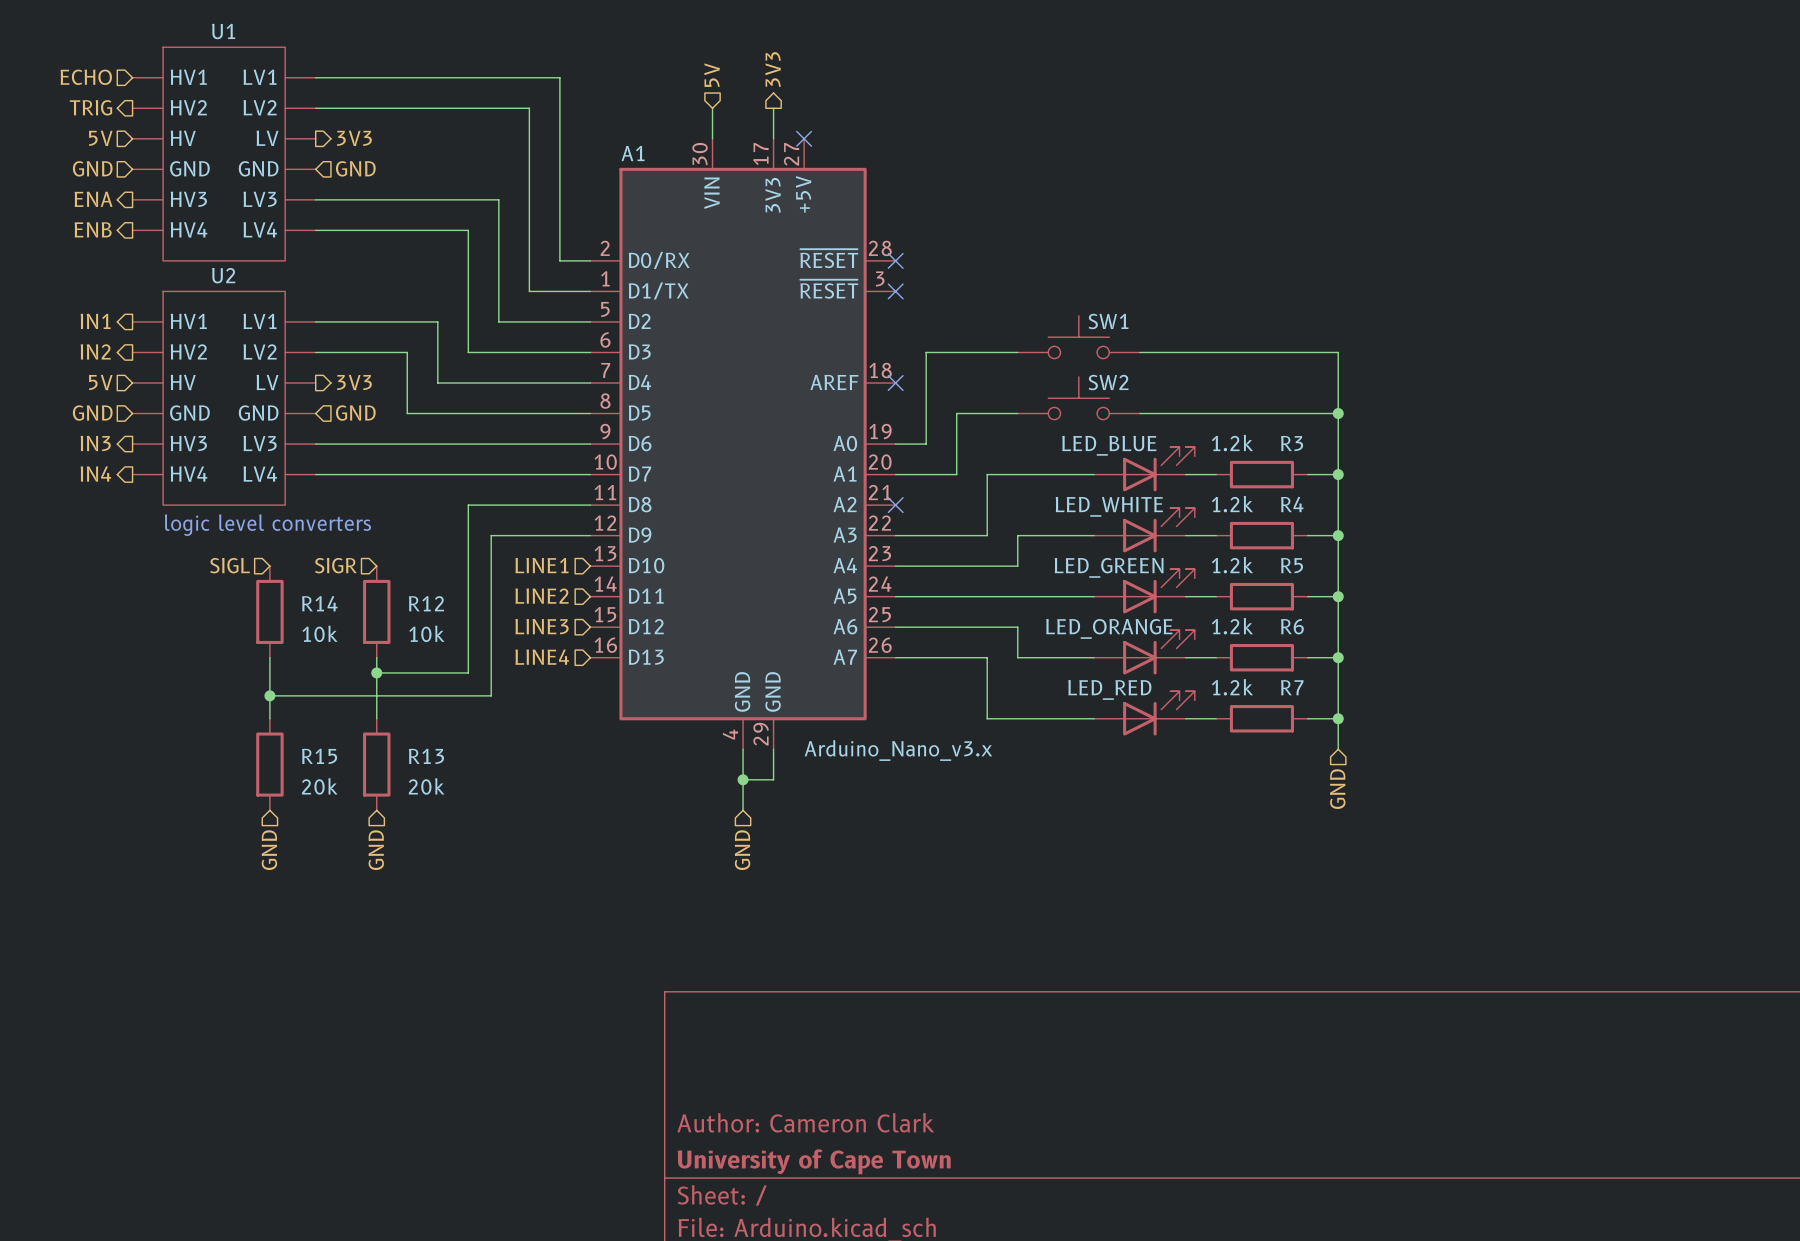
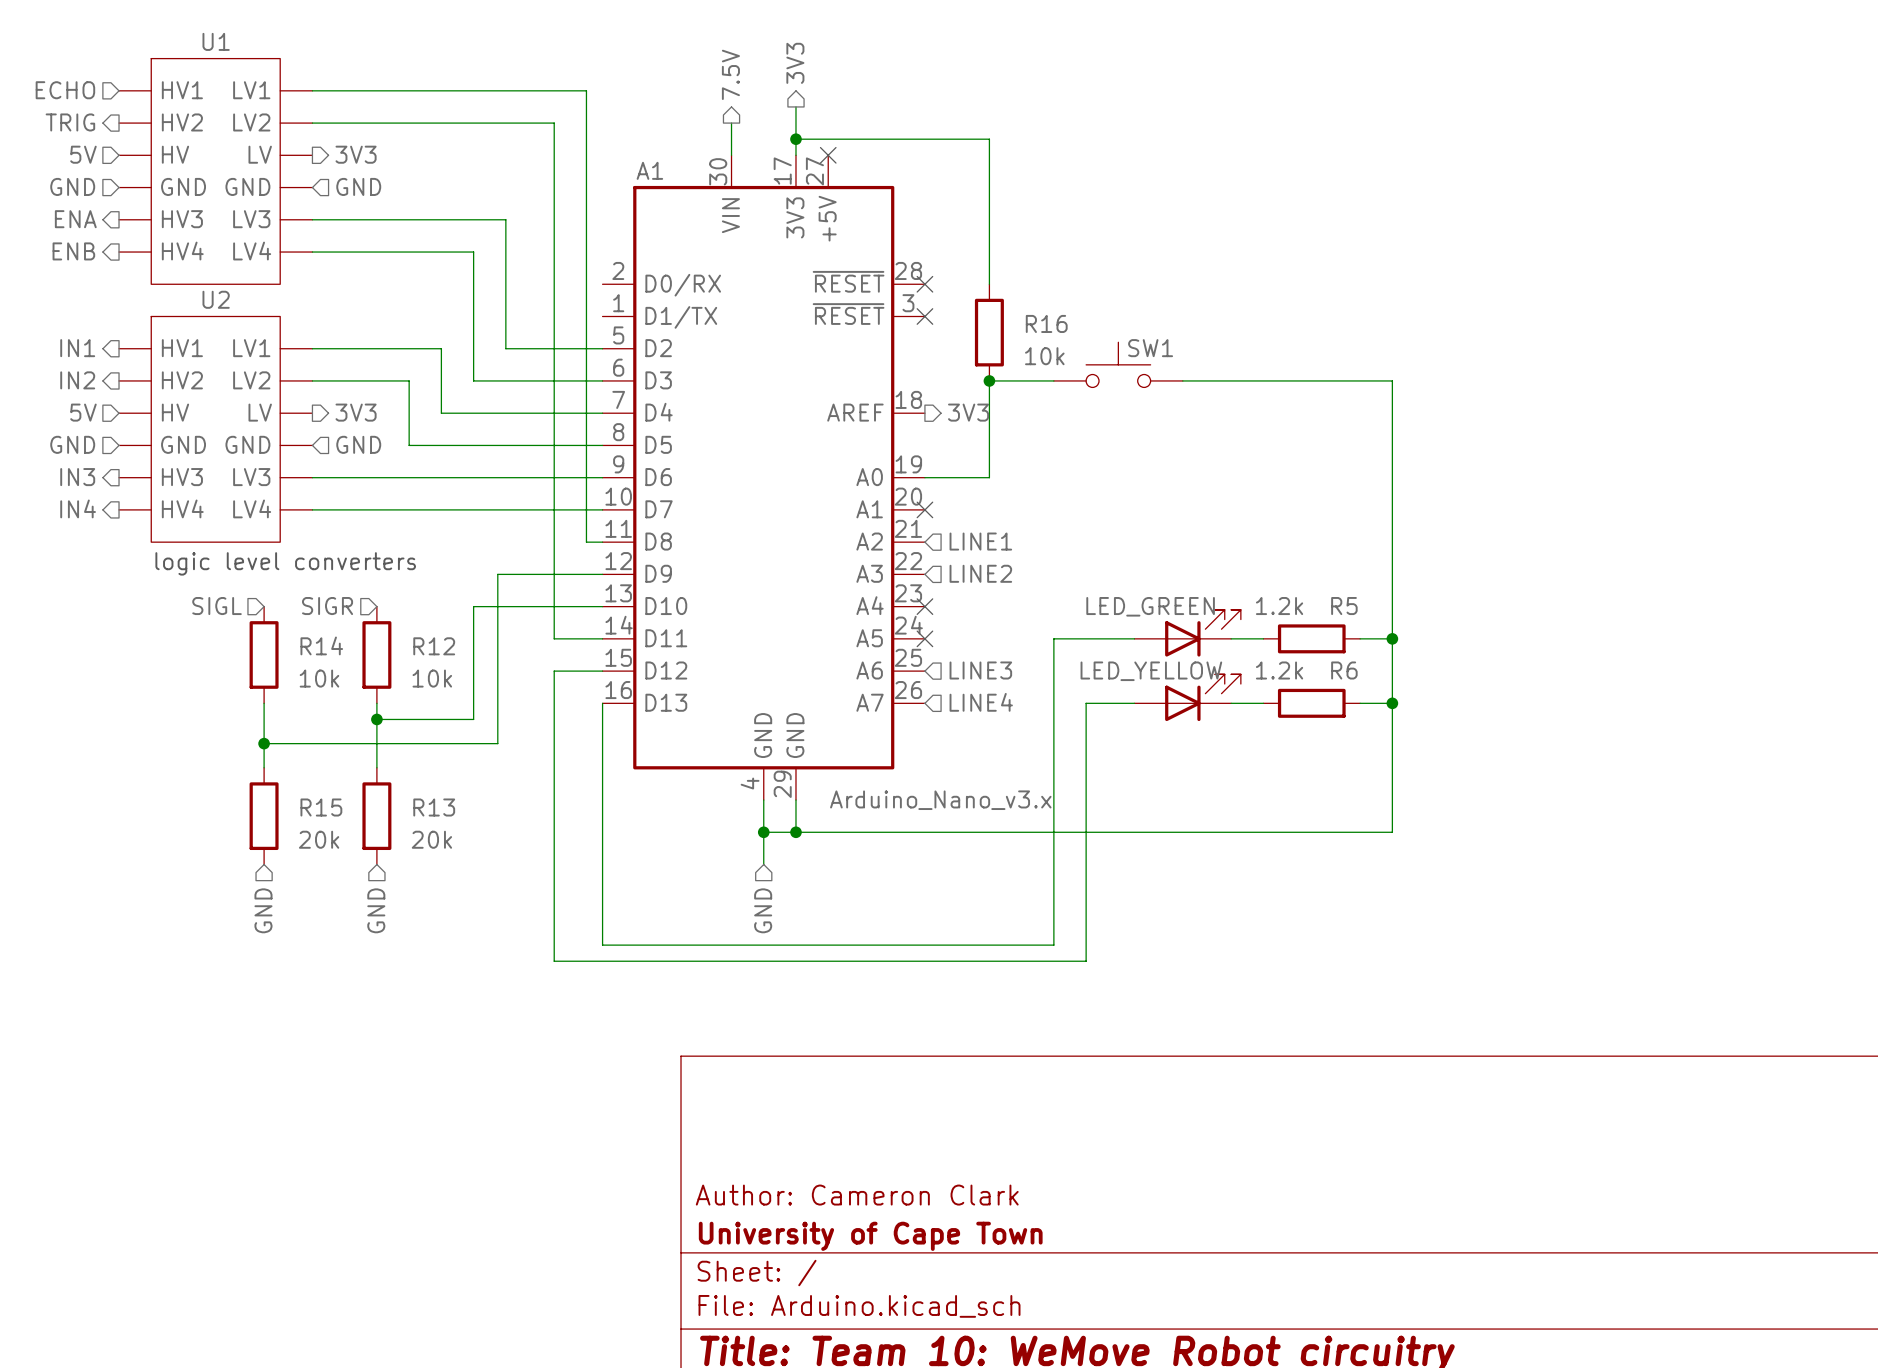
hierarchical label position: 3V3 (773, 69) -> 3V3 (795, 63)
hierarchical label shape: input (712, 75) -> output (730, 74)
hierarchical label: 5V (712, 75) -> 7.5V (730, 74)
wire: (559, 77) (559, 260) (590, 260) -> (570, 90) (586, 90) (586, 542)
wire: none -> (795, 106) (795, 123)
wire: (529, 108) (529, 291) (590, 291) -> (538, 123) (554, 123) (554, 638) (602, 638)
wire: none -> (795, 139) (989, 139) (989, 284)
junction: none -> (795, 139)
R16: none -> 10k (989, 332)
wire: (956, 352) (926, 352) (926, 444) -> (989, 380) (989, 445)
junction: none -> (989, 380)
hierarchical label: none -> 3V3 (968, 412)
no-connect mark: (895, 383) -> none
SW2: (1078, 398) -> none
wire: (956, 413) (1017, 413) -> none
wire: (1139, 413) (1338, 413) -> none
junction: (1338, 413) -> none
wire: (956, 444) (956, 474) (895, 474) -> (989, 477) (957, 477)
part: LED_BLUE (1144, 469) -> none
no-connect mark: none -> (924, 509)
wire: (1094, 474) (987, 474) (987, 535) (895, 535) -> none
wire: (1185, 474) (1216, 474) -> none
R3: 1.2k (1261, 474) -> none
wire: (1307, 474) (1338, 474) -> none
junction: (1338, 474) -> none
hierarchical label: none -> LINE1 (980, 541)
wire: (575, 505) (468, 505) (468, 566) -> (602, 606) (473, 606)
no-connect mark: (895, 505) -> none
part: LED_WHITE (1144, 530) -> none
hierarchical label: none -> LINE2 (980, 573)
wire: (1094, 535) (1017, 535) (1017, 566) (895, 566) -> none
wire: (1185, 535) (1216, 535) -> none
R4: 1.2k (1261, 535) -> none
wire: (1307, 535) (1338, 535) -> none
junction: (1338, 535) -> none
hierarchical label: LINE1 (541, 565) -> none
no-connect mark: none -> (924, 606)
hierarchical label: LINE2 (542, 596) -> none
wire: (895, 596) (1017, 596) -> (1053, 671) (1053, 638)
no-connect mark: none -> (924, 638)
hierarchical label: LINE3 (542, 626) -> none
hierarchical label: none -> LINE3 (980, 670)
wire: (895, 627) (1017, 627) -> none
part value: LED_ORANGE (1109, 628) -> LED_YELLOW (1151, 671)
hierarchical label: LINE4 (542, 657) -> none
wire: none -> (602, 703) (602, 945) (1053, 945) (1053, 703)
wire: (895, 657) (987, 657) (987, 718) (1094, 718) -> none
hierarchical label: none -> LINE4 (981, 702)
wire: (1017, 657) (1048, 657) -> (602, 671) (554, 671) (554, 961) (1086, 961) (1086, 703)
part: LED_RED (1144, 713) -> none
wire: (1185, 718) (1216, 718) -> none
R7: 1.2k (1261, 718) -> none
wire: (1307, 718) (1338, 718) -> none
junction: (1338, 718) -> none
wire: none -> (1392, 800) (1392, 832) (795, 832)
junction: none -> (795, 832)
hierarchical label: GND (1337, 789) -> none

